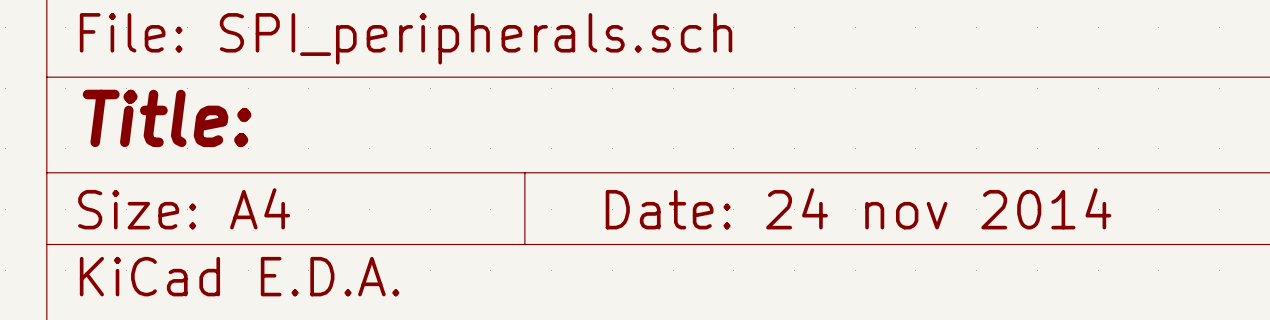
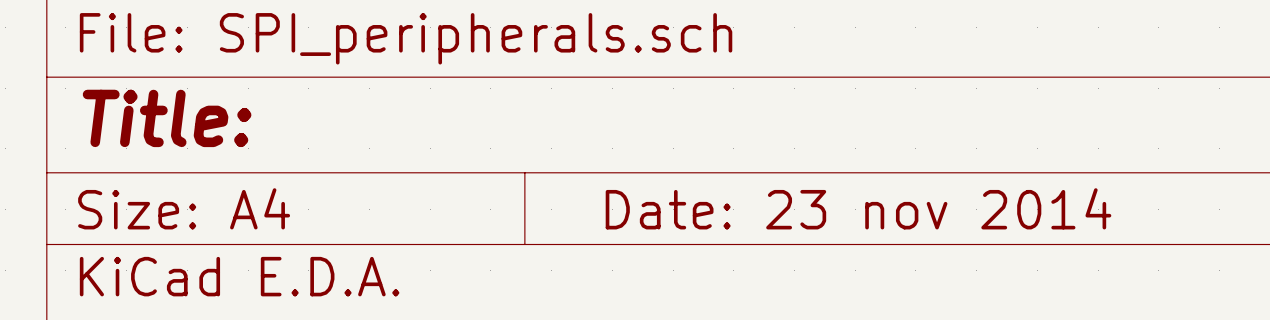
title block: Date: 24 nov 2014 (858, 208) -> Date: 23 nov 2014 (858, 208)

